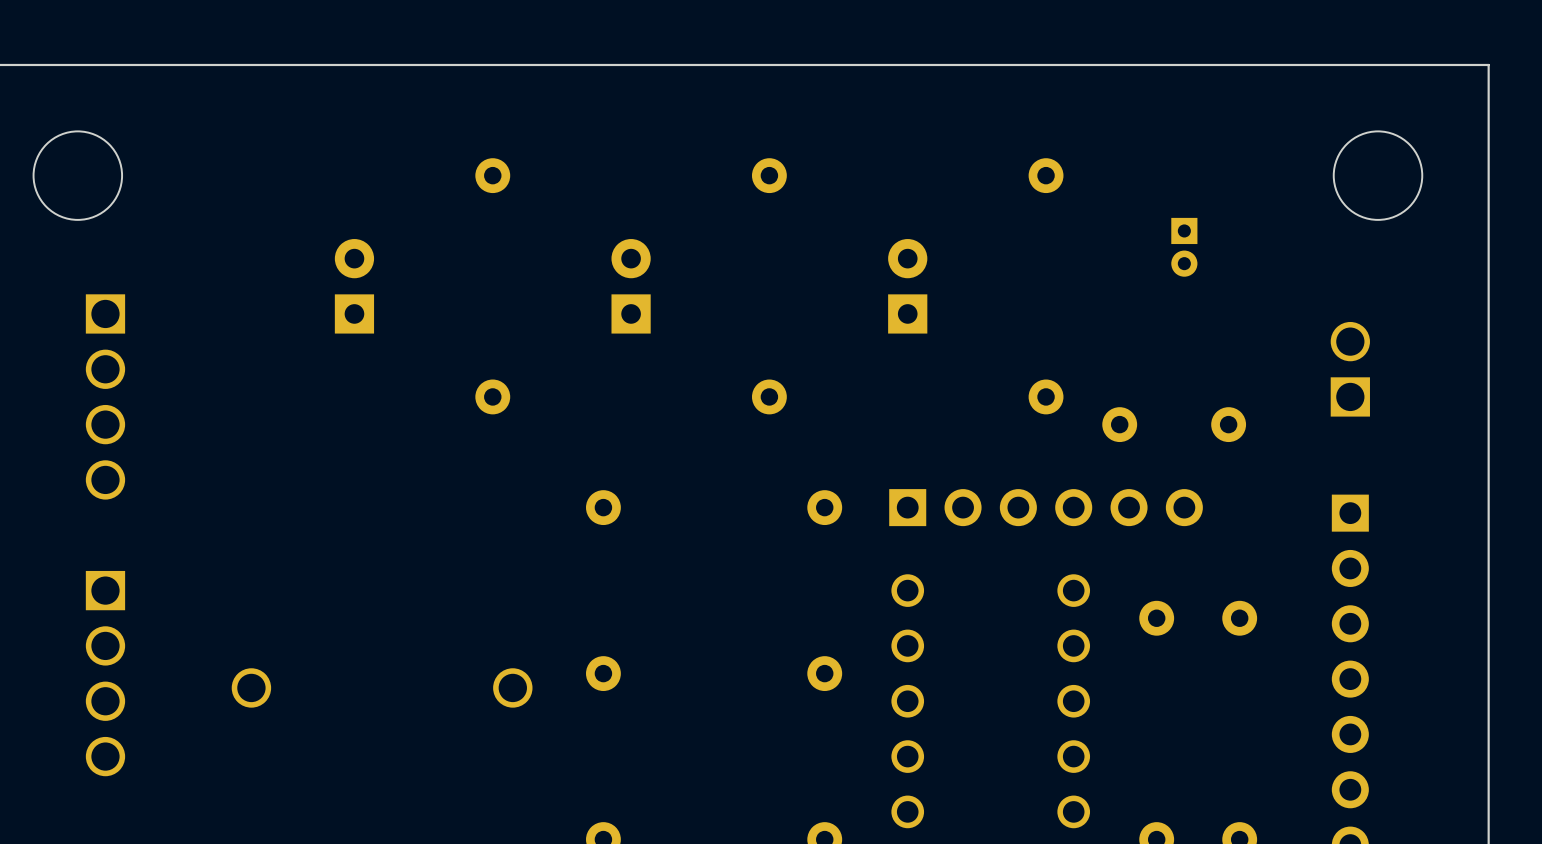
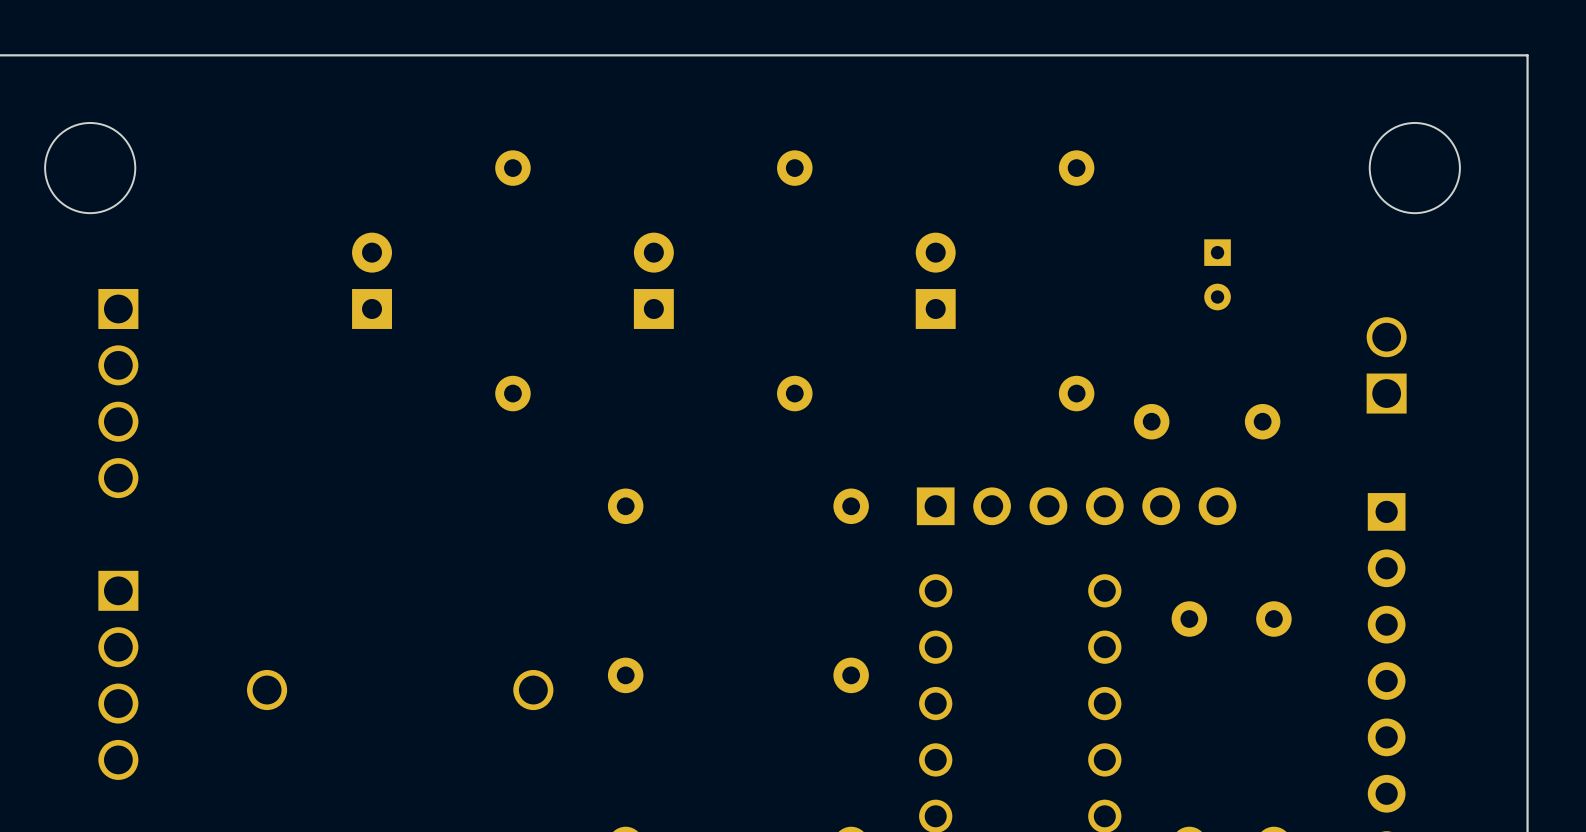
part: (1184, 247) -> none
part: none -> (1217, 274)

